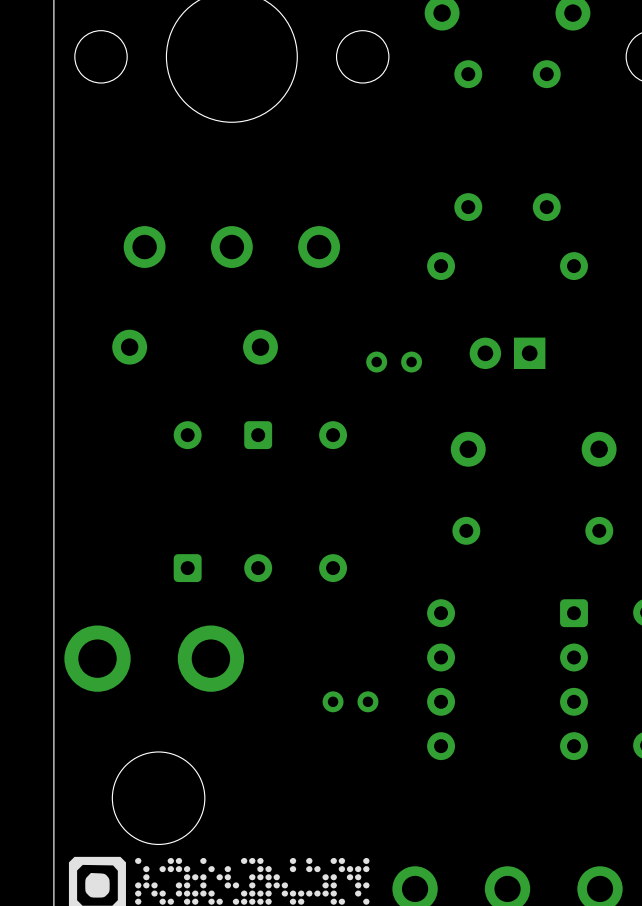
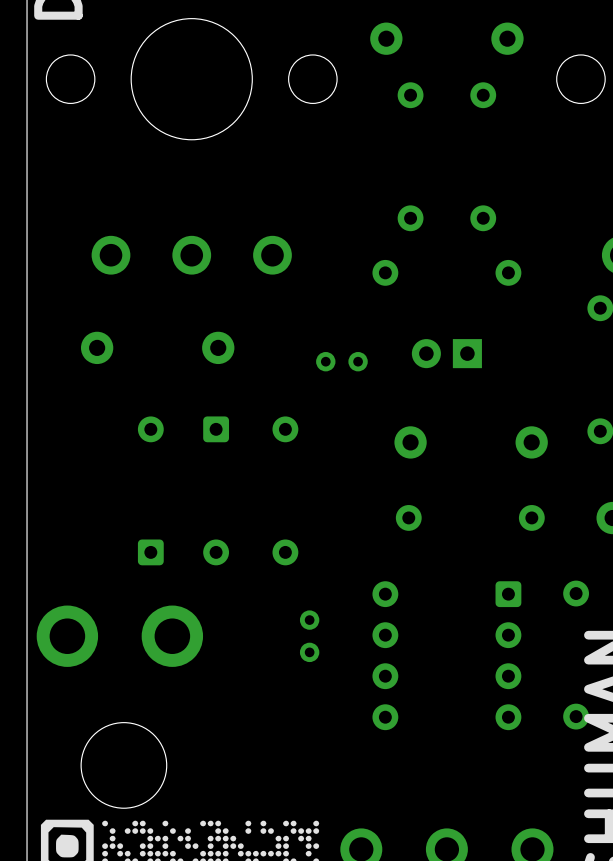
part rotation: 0° (350, 701) -> 90° clockwise (309, 636)
part position: (350, 701) -> (309, 636)

